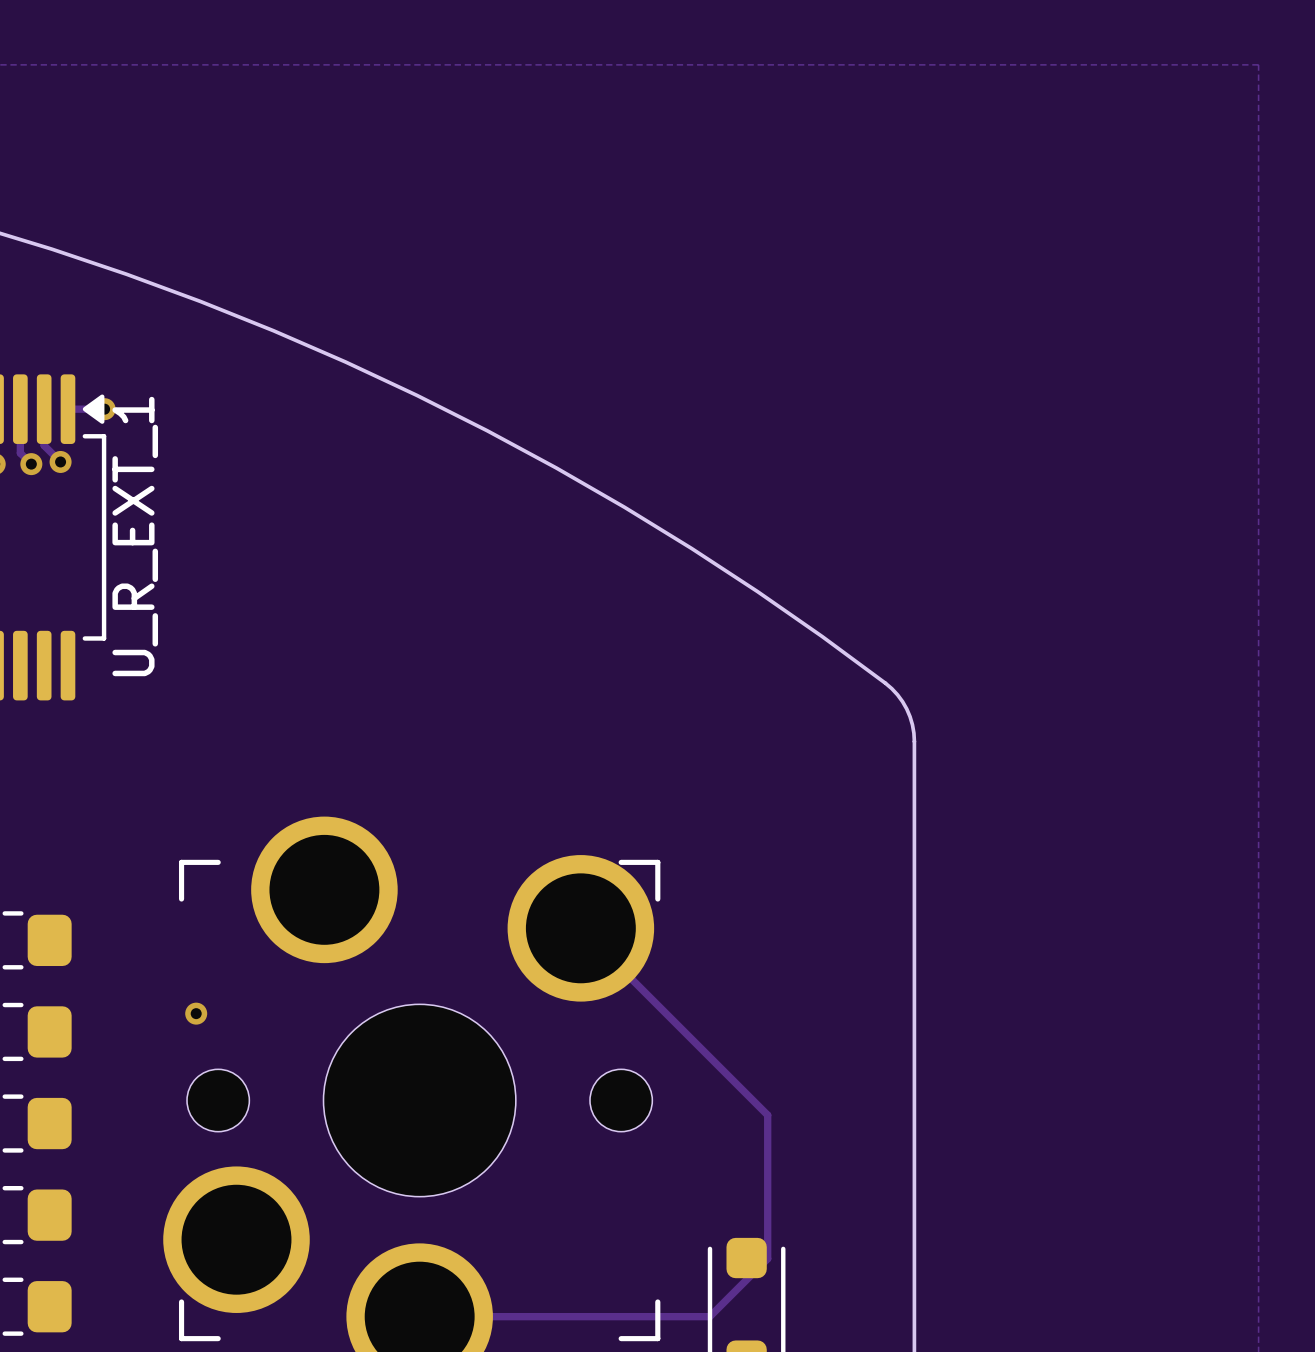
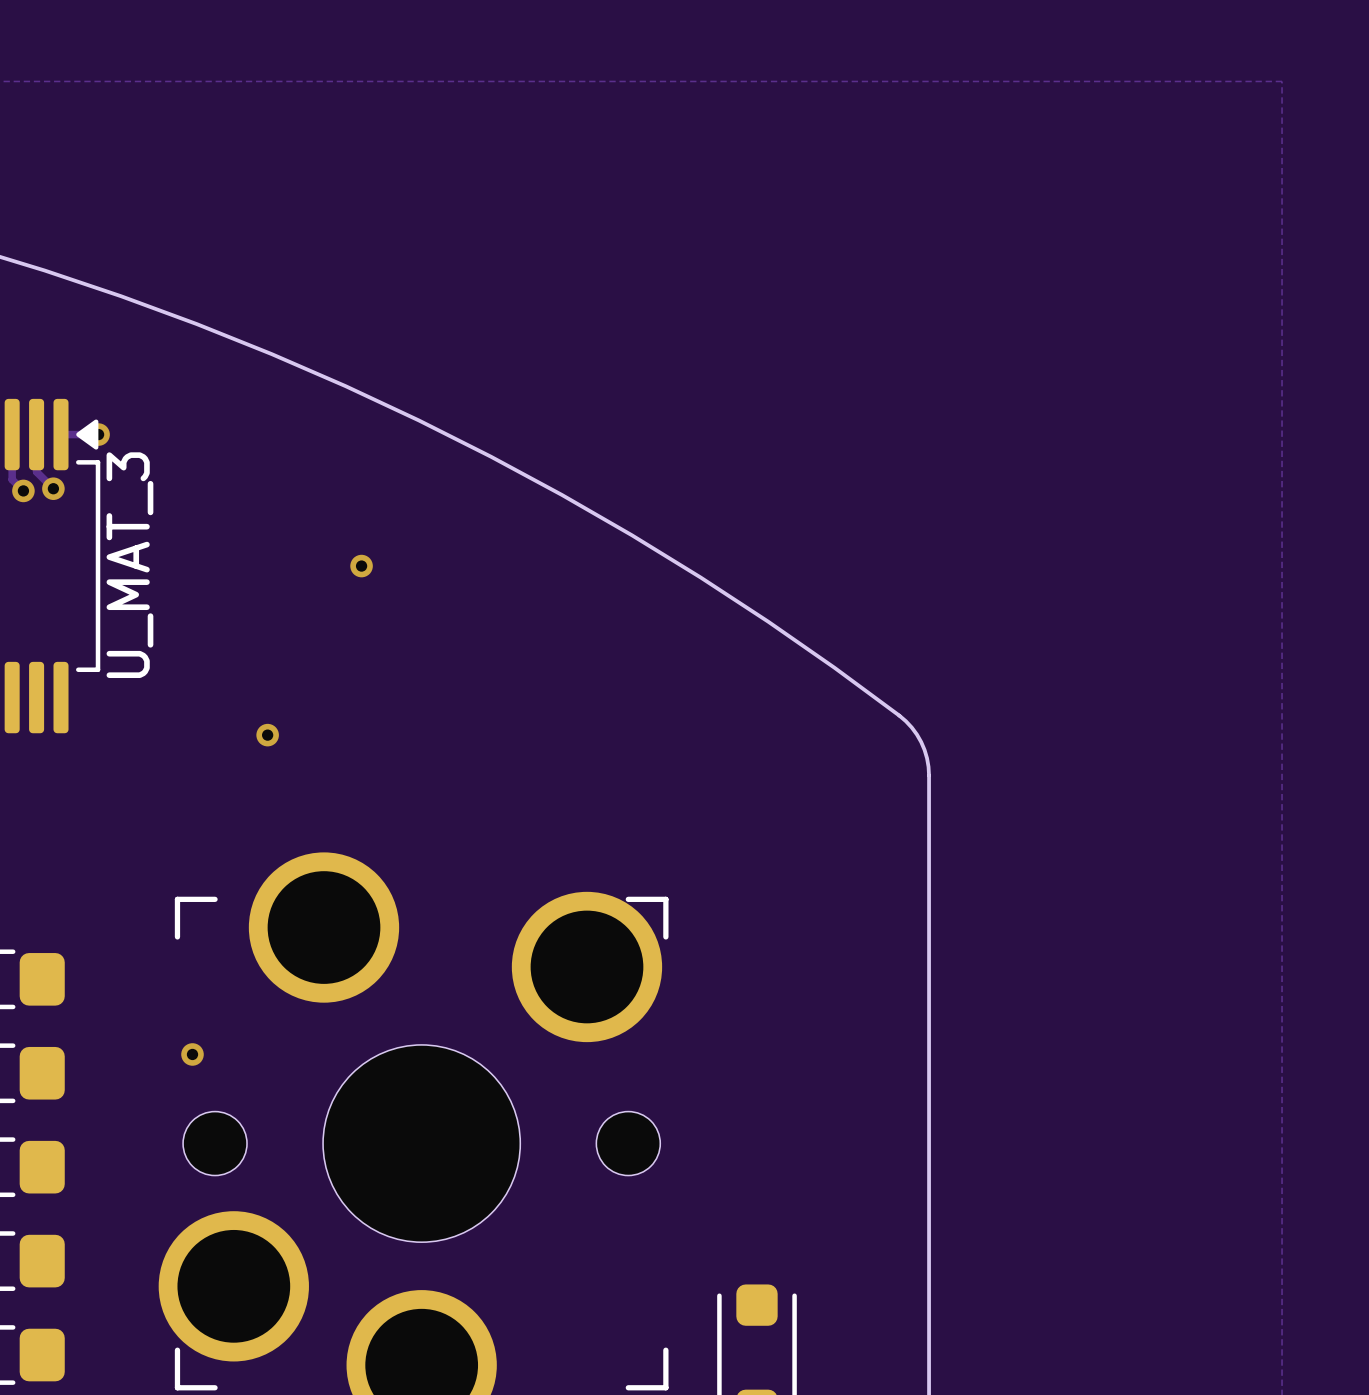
U_R_EXT_1 name: U_R_EXT_1 (135, 536) -> U_MAT_3 (129, 565)
via: none -> (361, 566)
via: none -> (267, 735)
track: (580, 928) (767, 1115) (767, 1258) (709, 1316) (419, 1316) -> none

